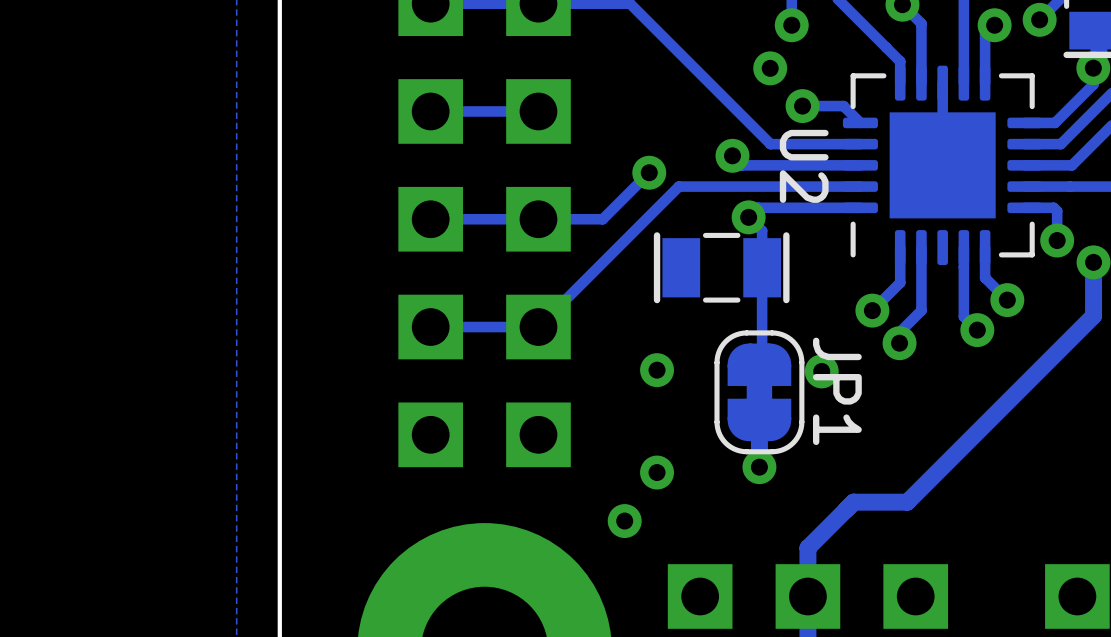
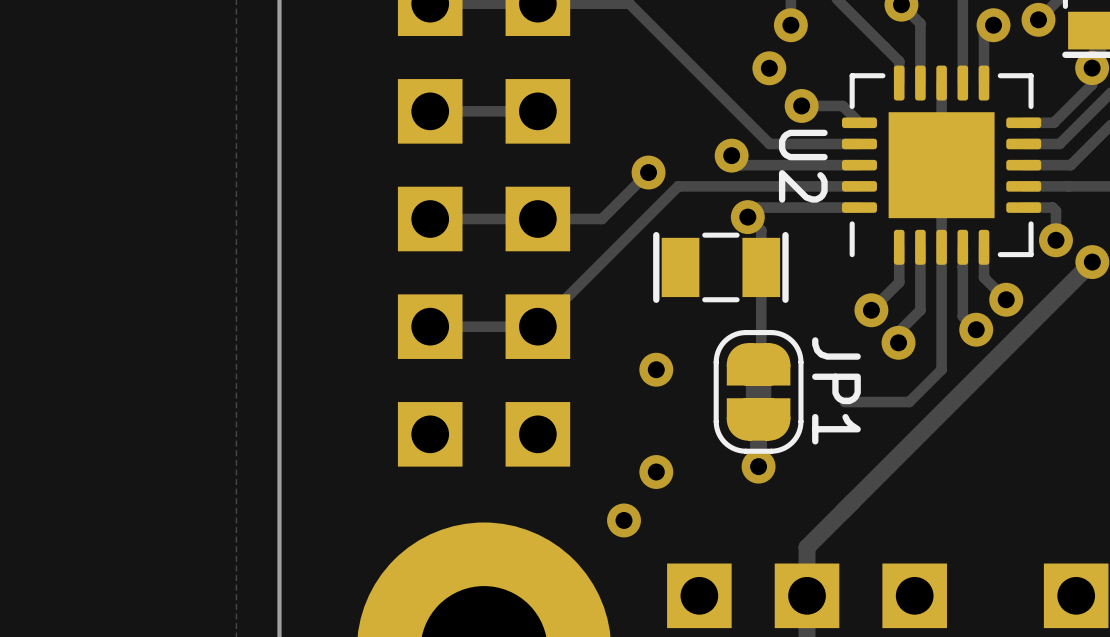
track: none -> (941, 165) (941, 369) (909, 402) (844, 402)
track: (1093, 262) (1093, 316) (907, 502) (853, 502) -> (1092, 262) (852, 501)
via: (821, 371) -> none

